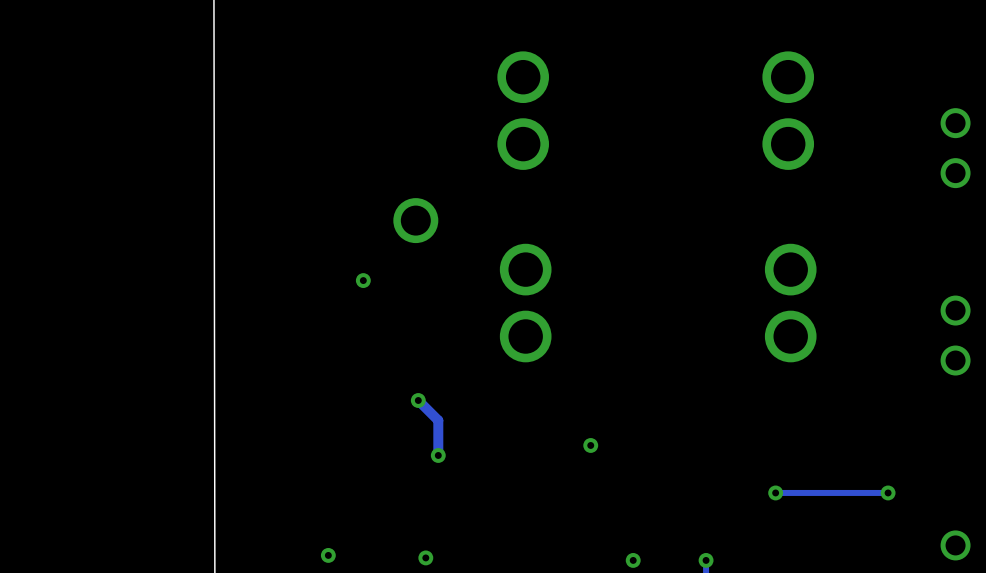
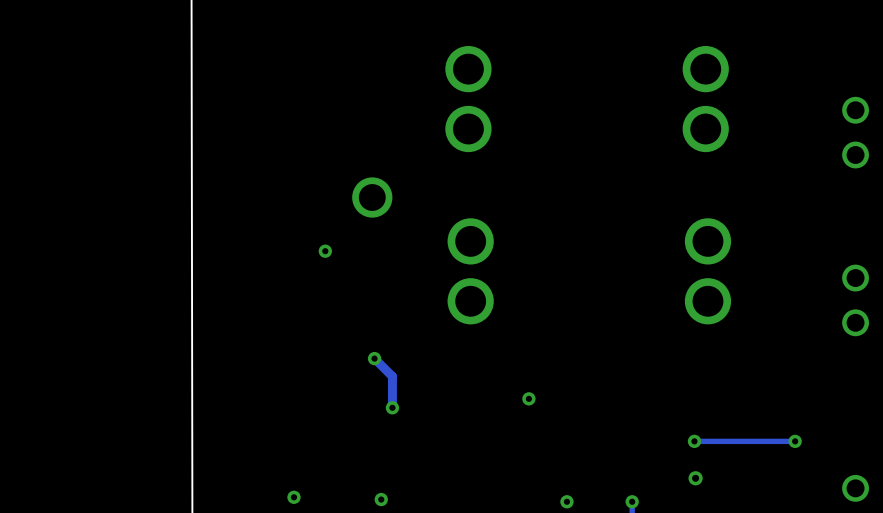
via: none -> (695, 478)

